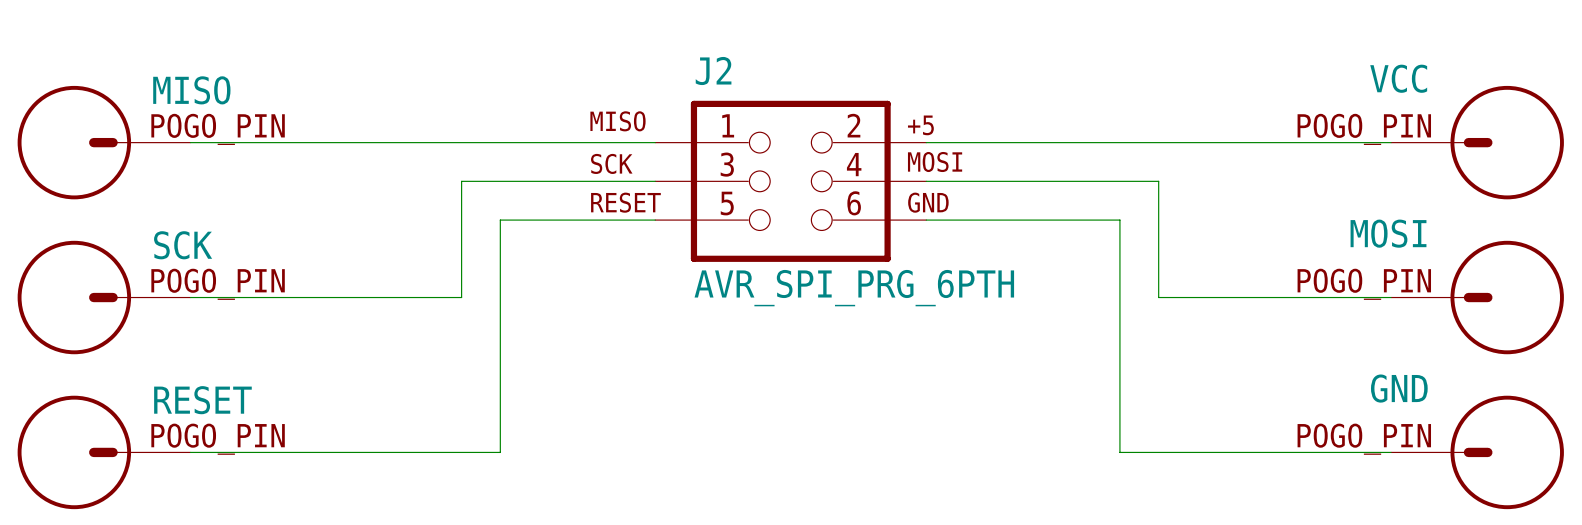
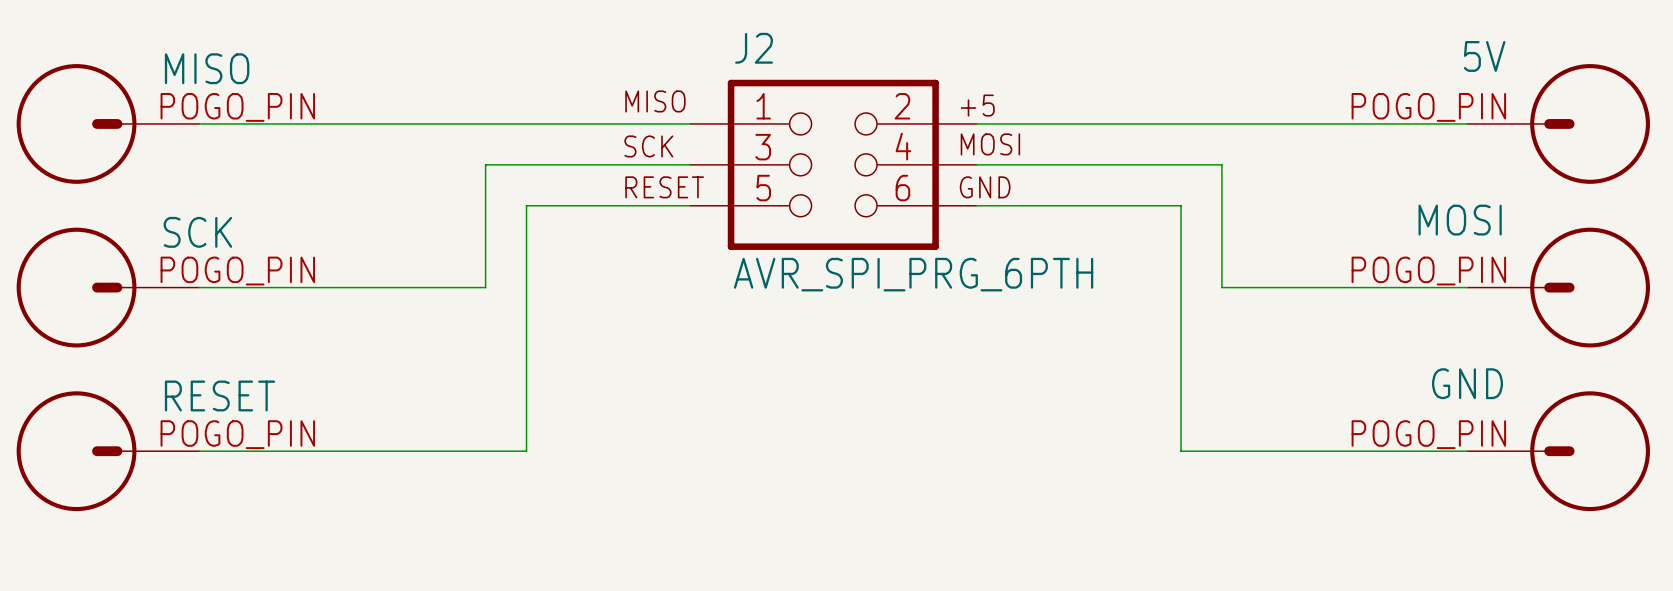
VCC name: VCC (1398, 78) -> 5V (1484, 56)

